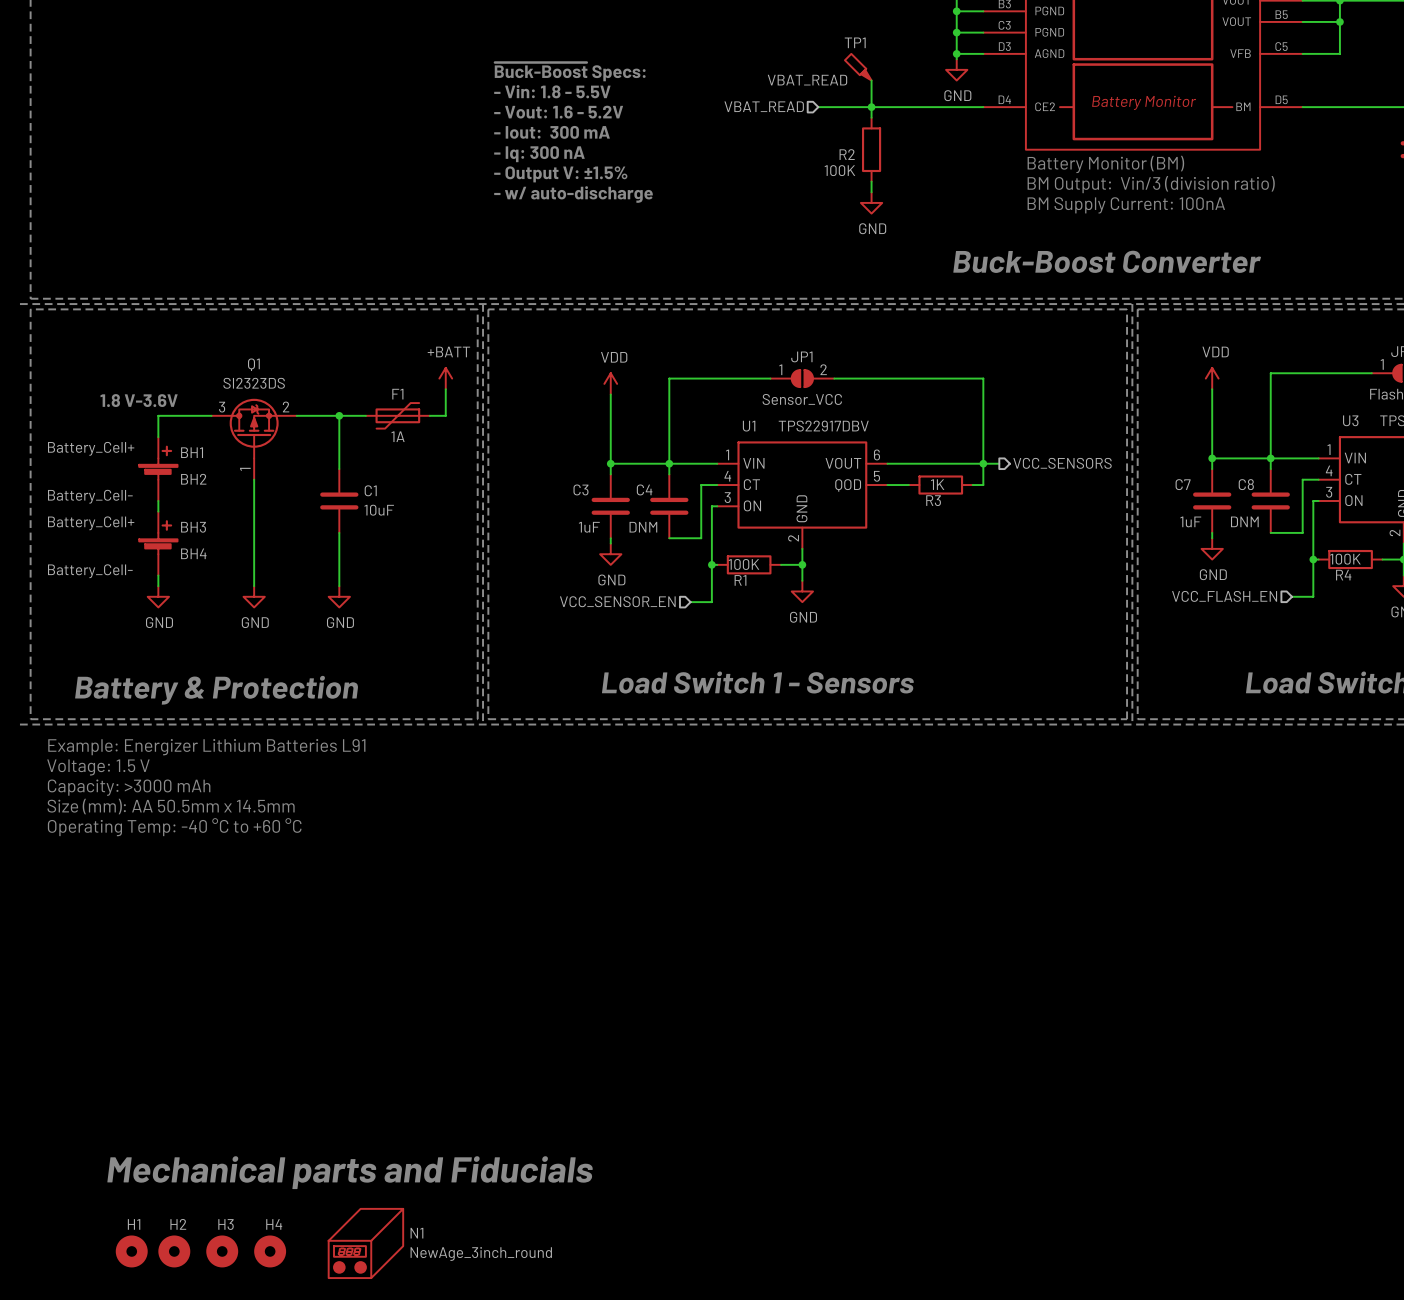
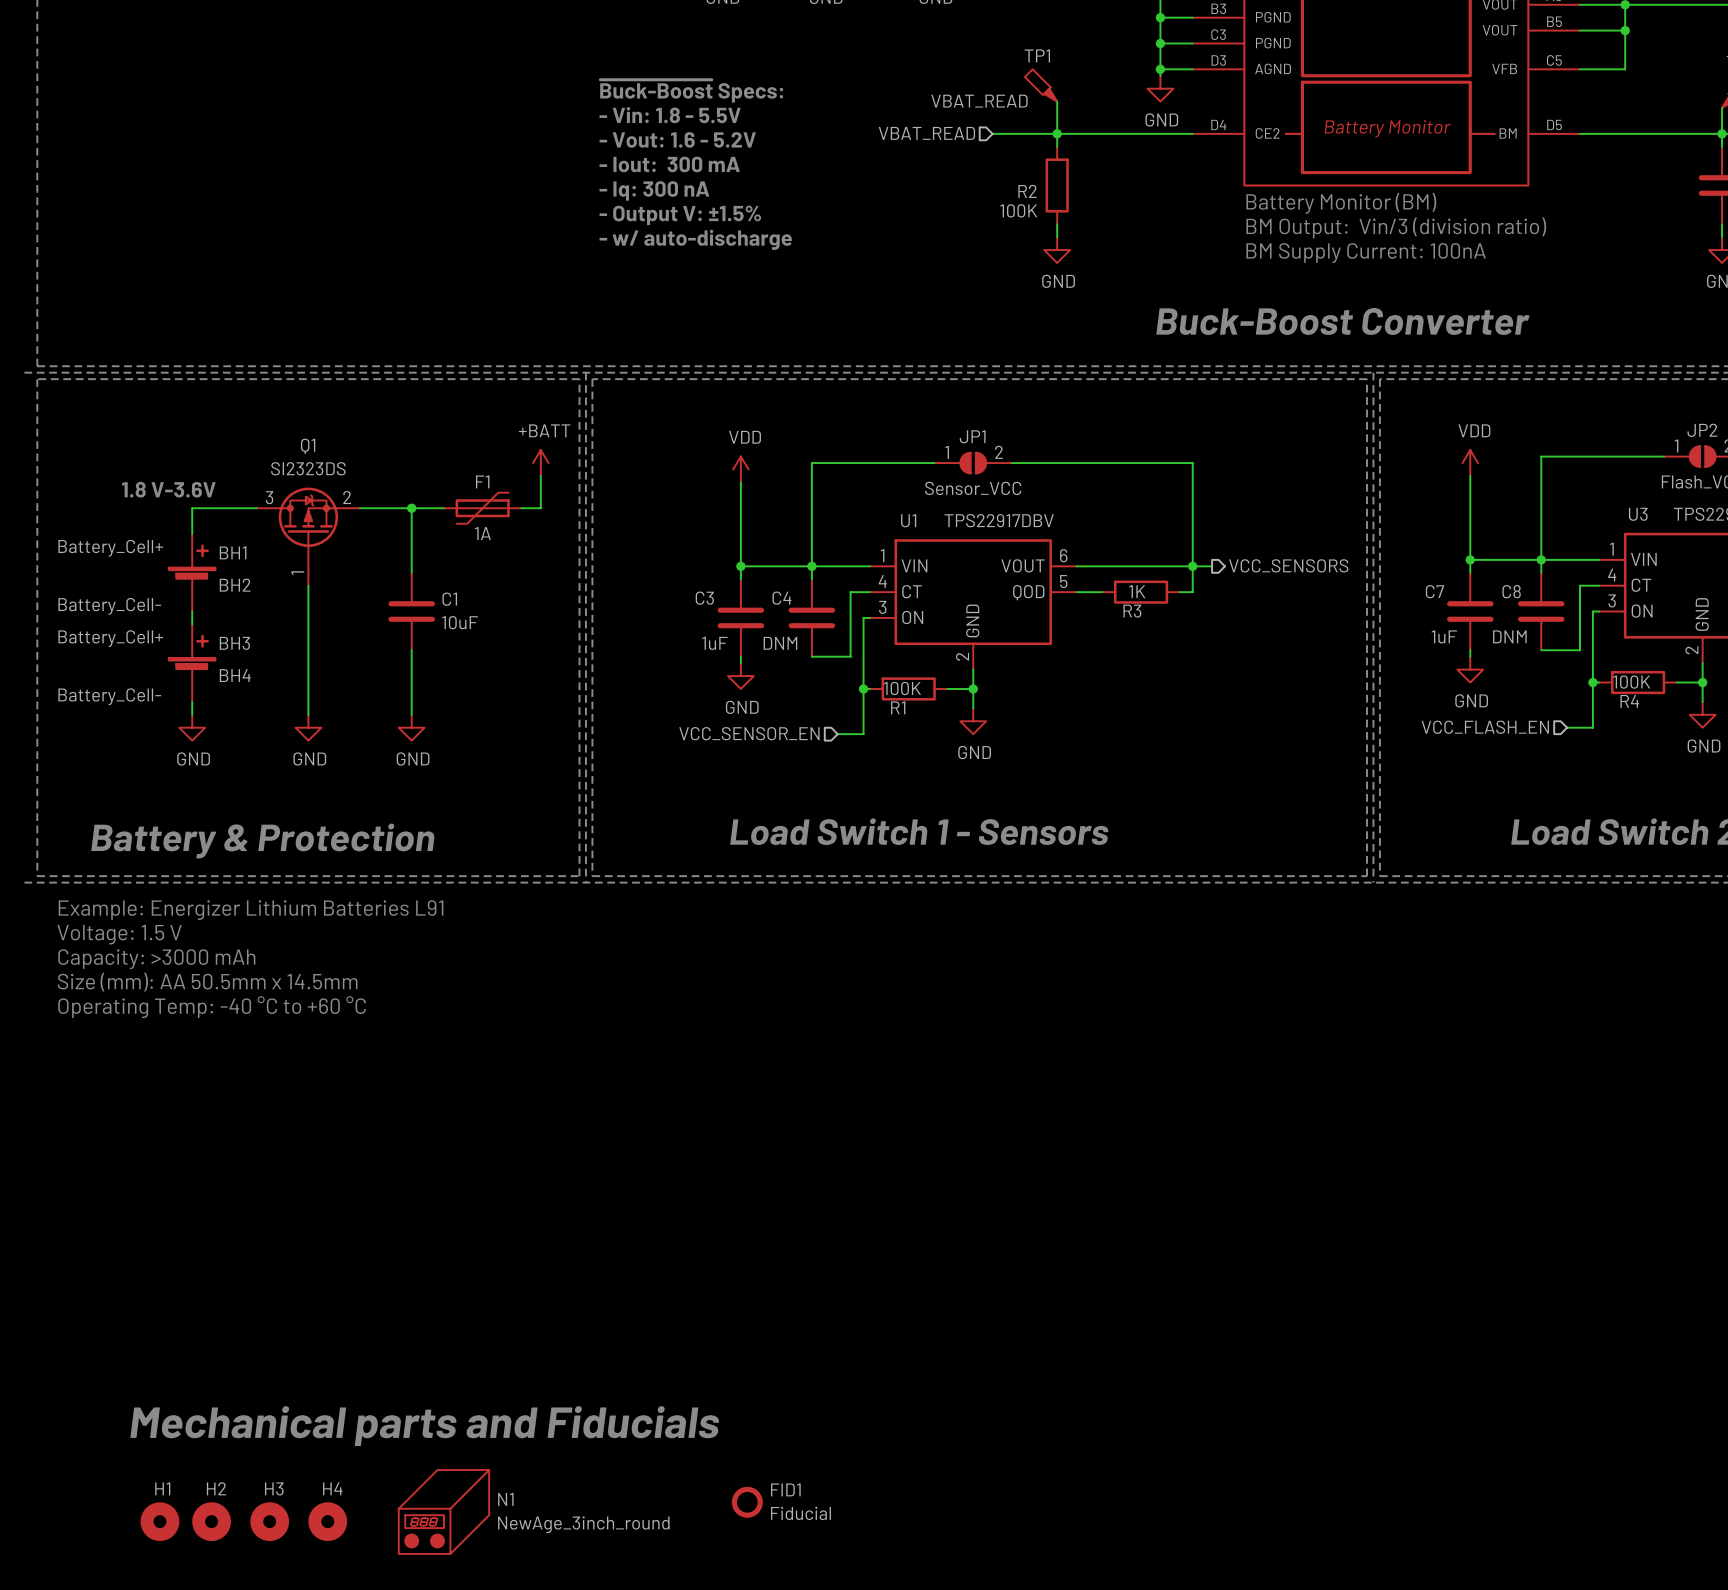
FID1: none -> Fiducial (747, 1502)

